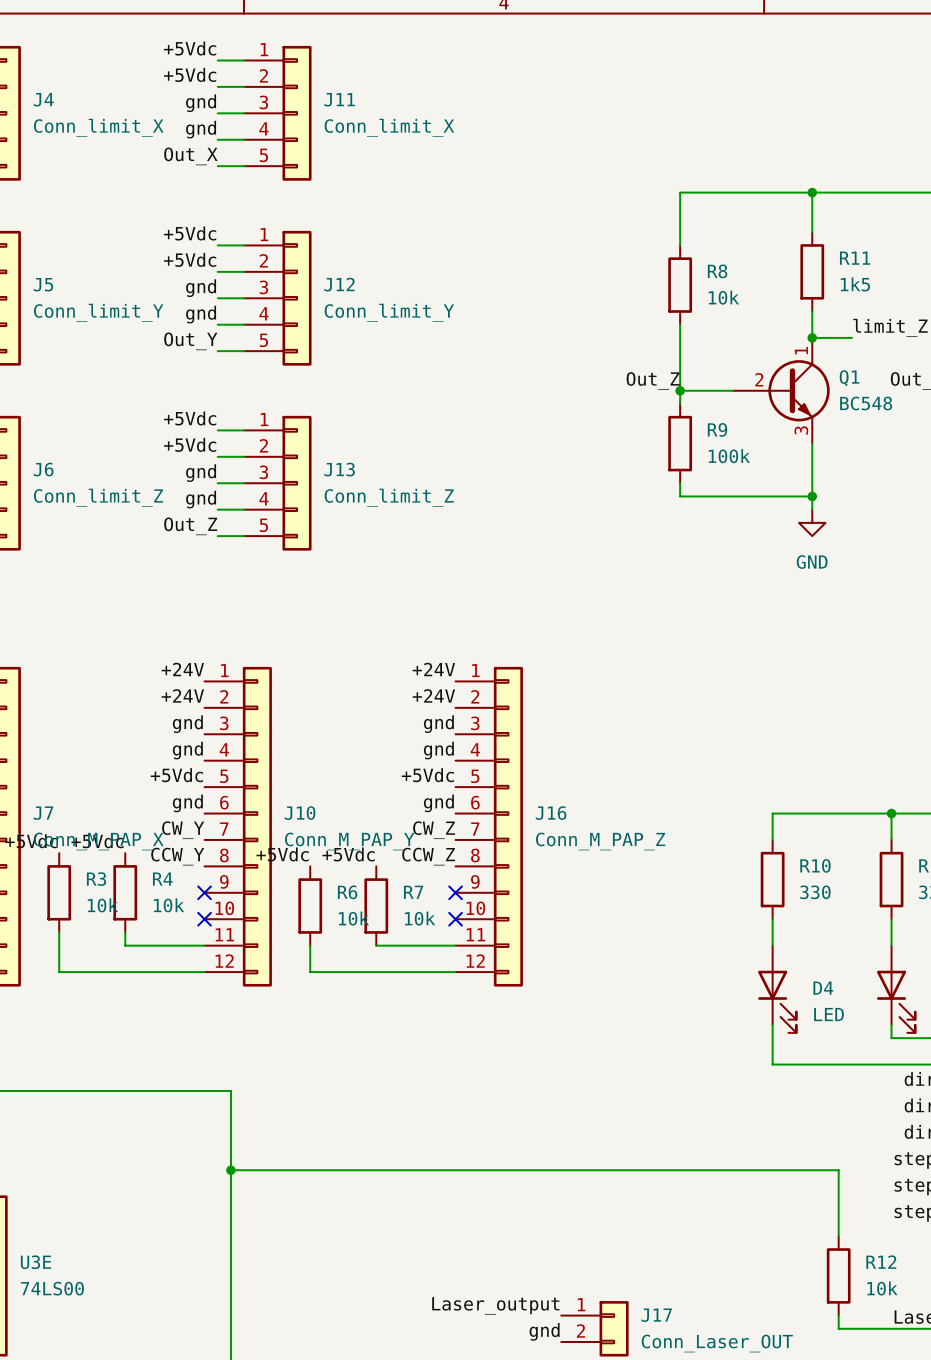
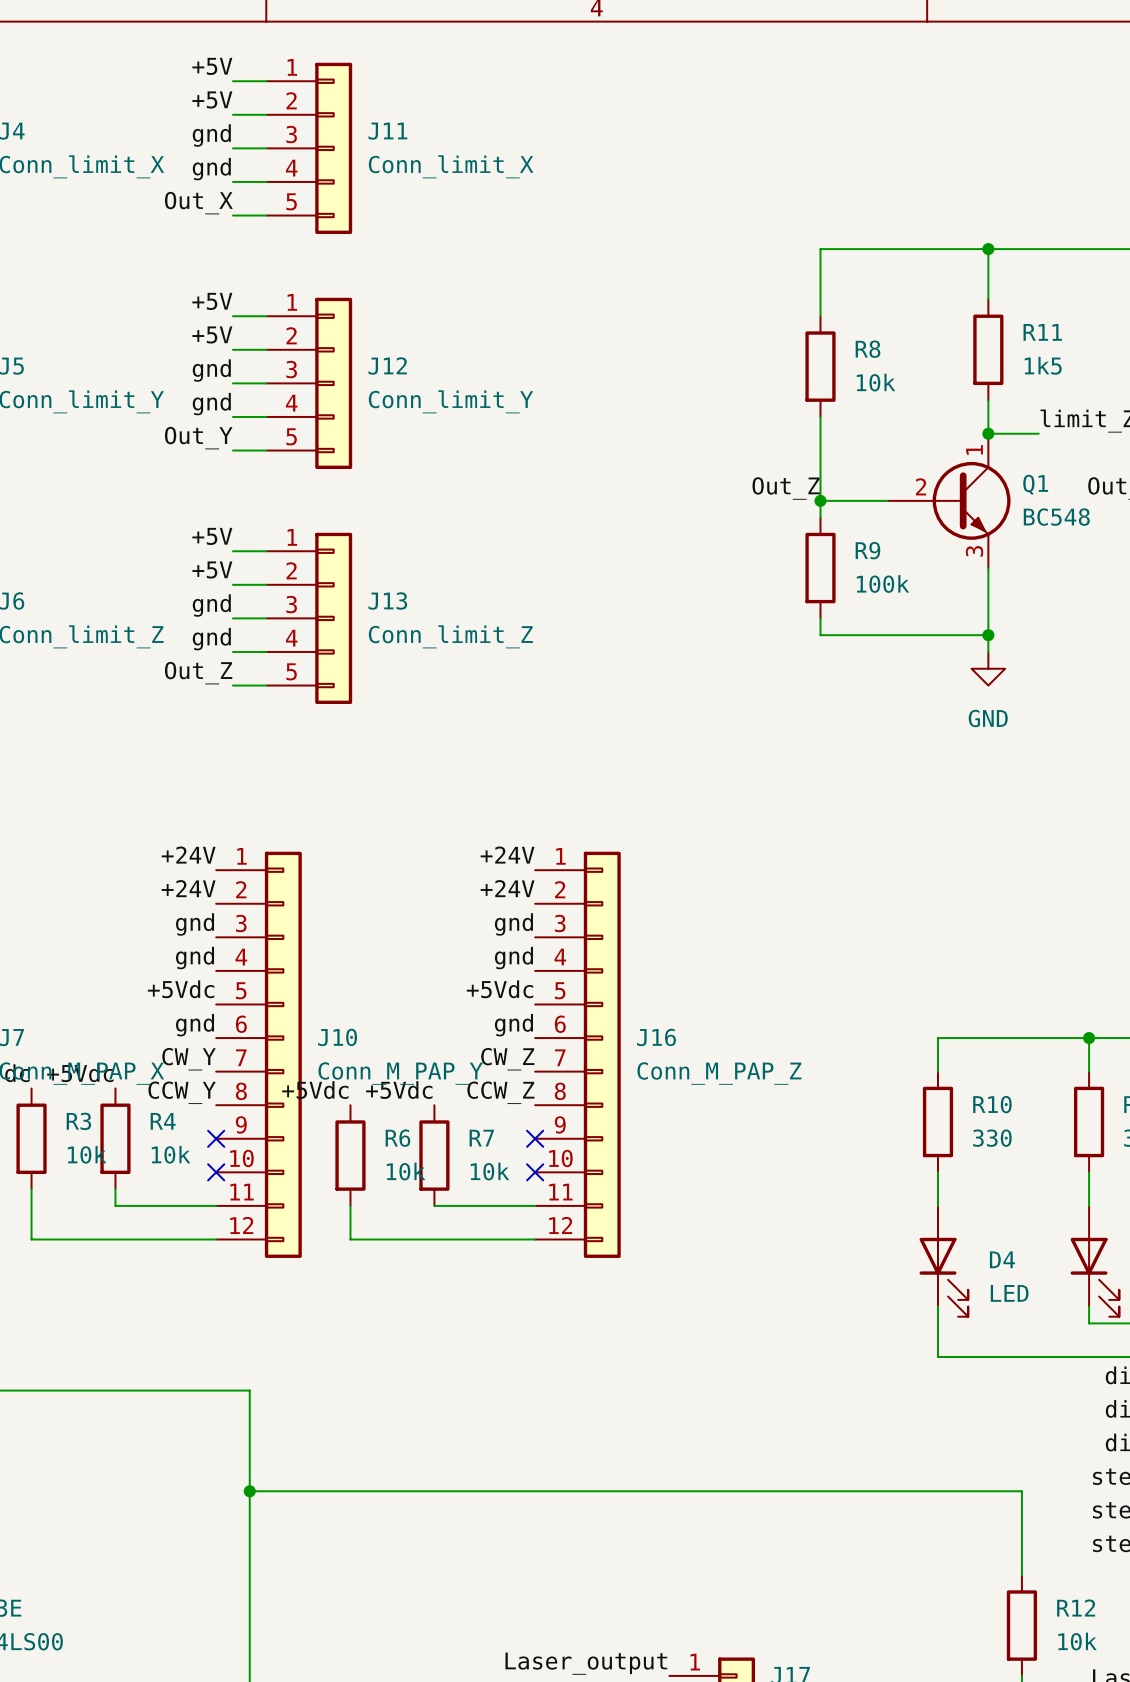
label: +5Vdc (190, 48) -> +5V (212, 66)
label: +5Vdc (190, 74) -> +5V (212, 99)
label: +5Vdc (190, 233) -> +5V (212, 301)
label: +5Vdc (190, 259) -> +5V (212, 334)
label: +5Vdc (190, 418) -> +5V (212, 536)
label: +5Vdc (190, 444) -> +5V (212, 570)

